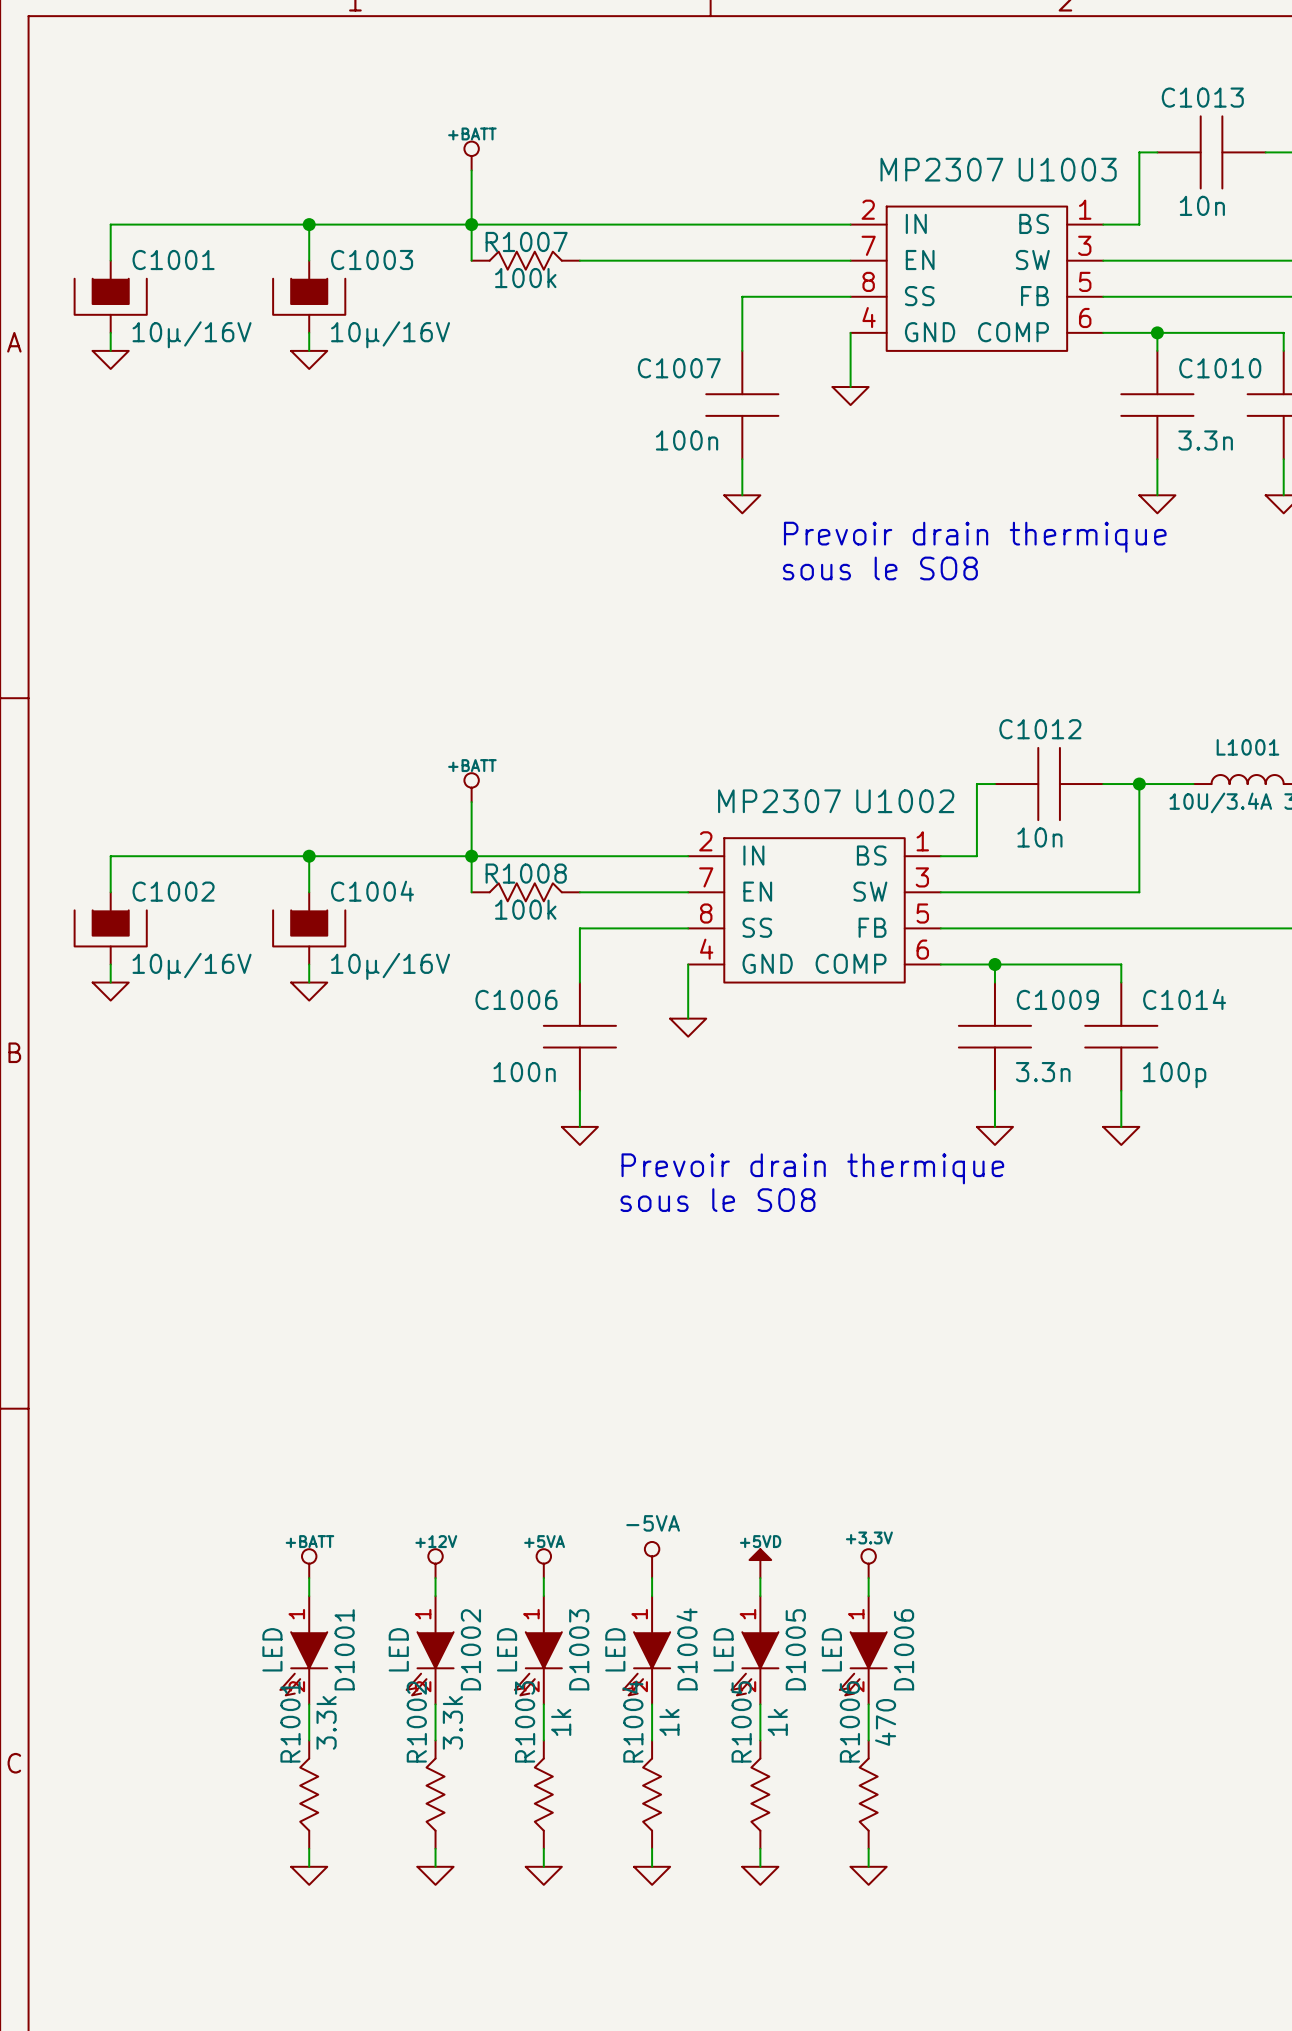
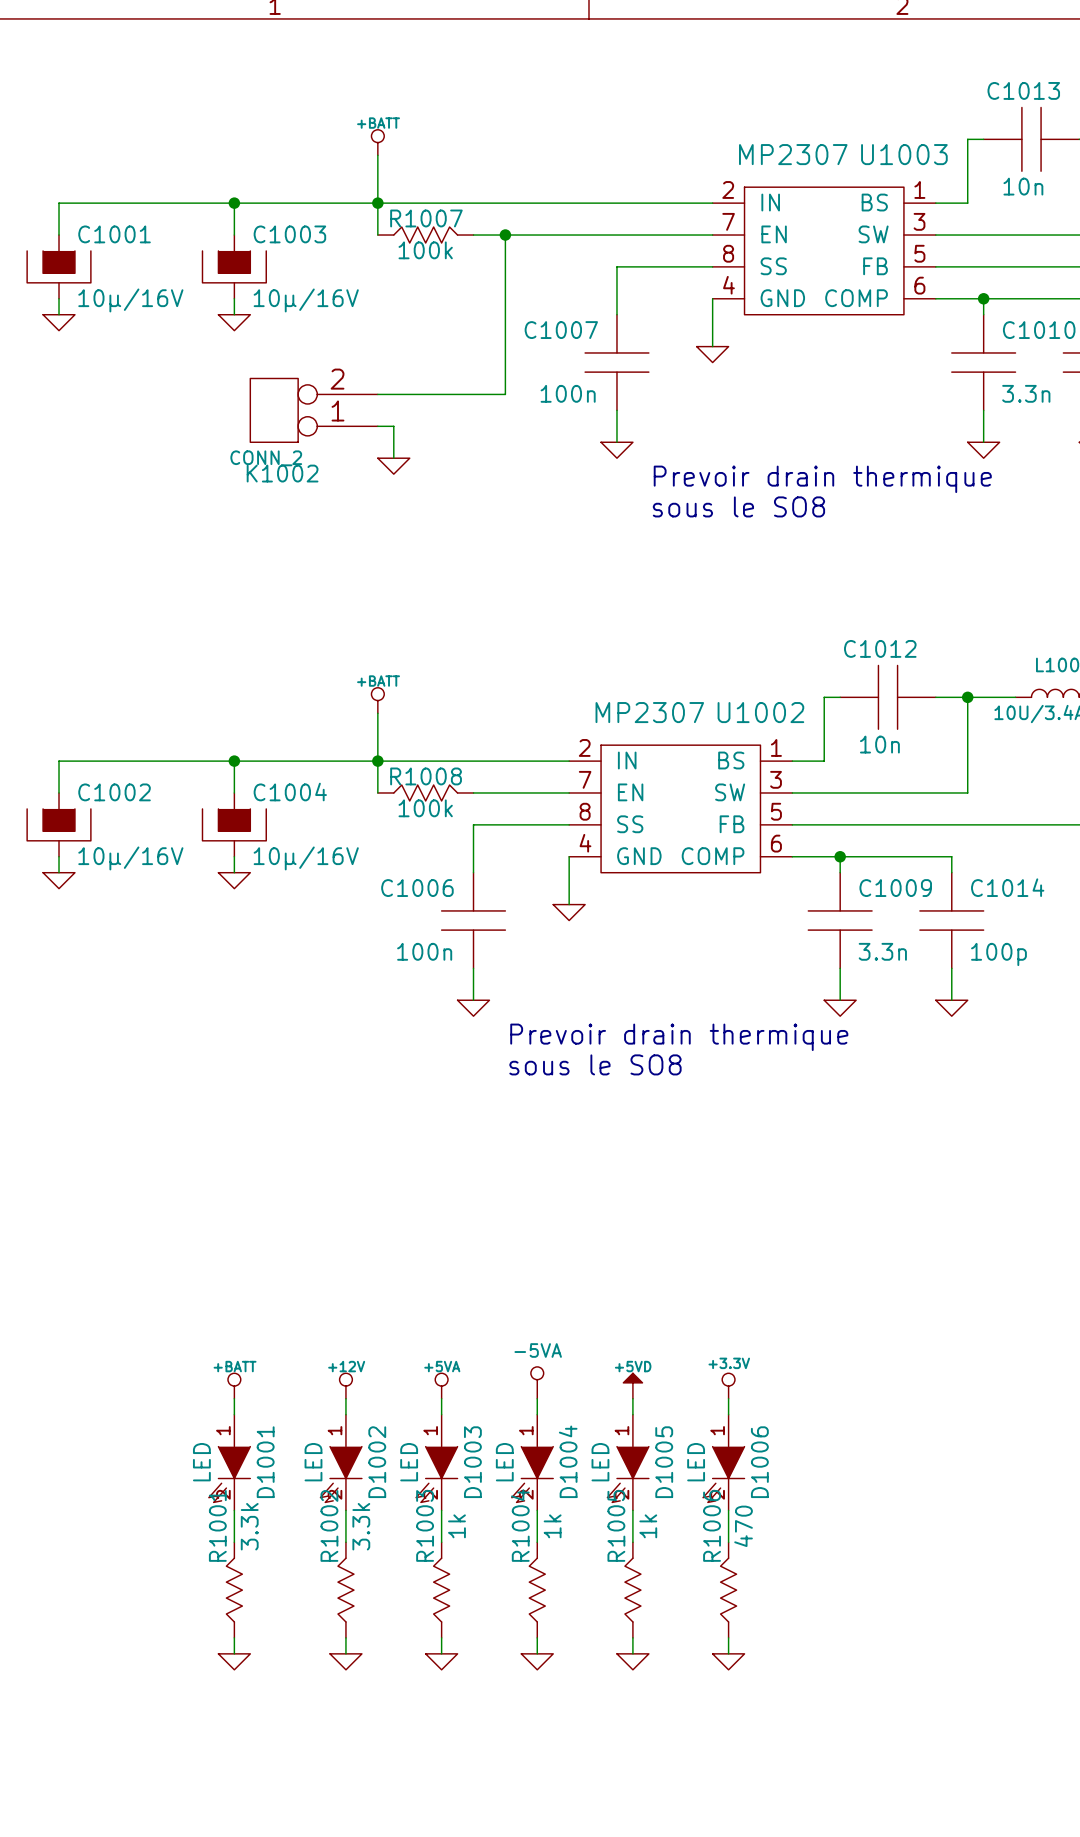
wire: none -> (505, 235) (505, 394) (377, 394)
junction: none -> (505, 235)
K1002: none -> CONN_2 (314, 410)
wire: none -> (377, 426) (393, 426) (393, 458)
power symbol: none -> (393, 466)

